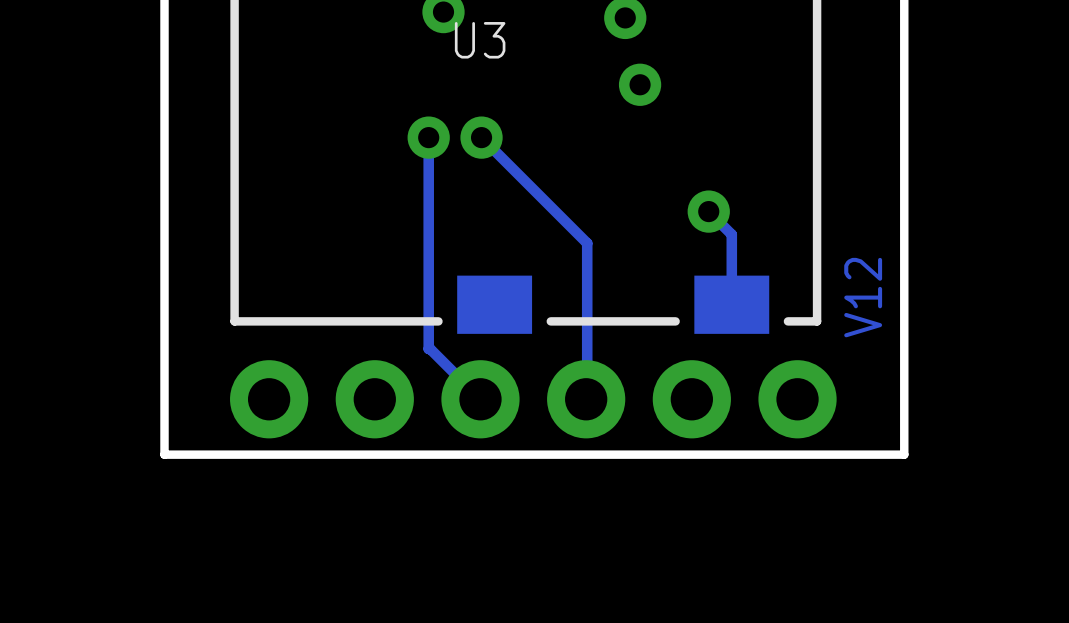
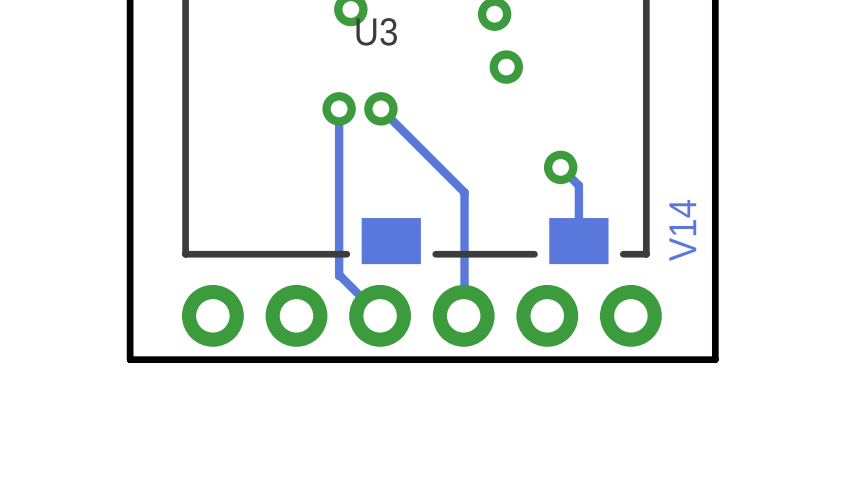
text: V12 (863, 297) -> V14 (682, 230)

